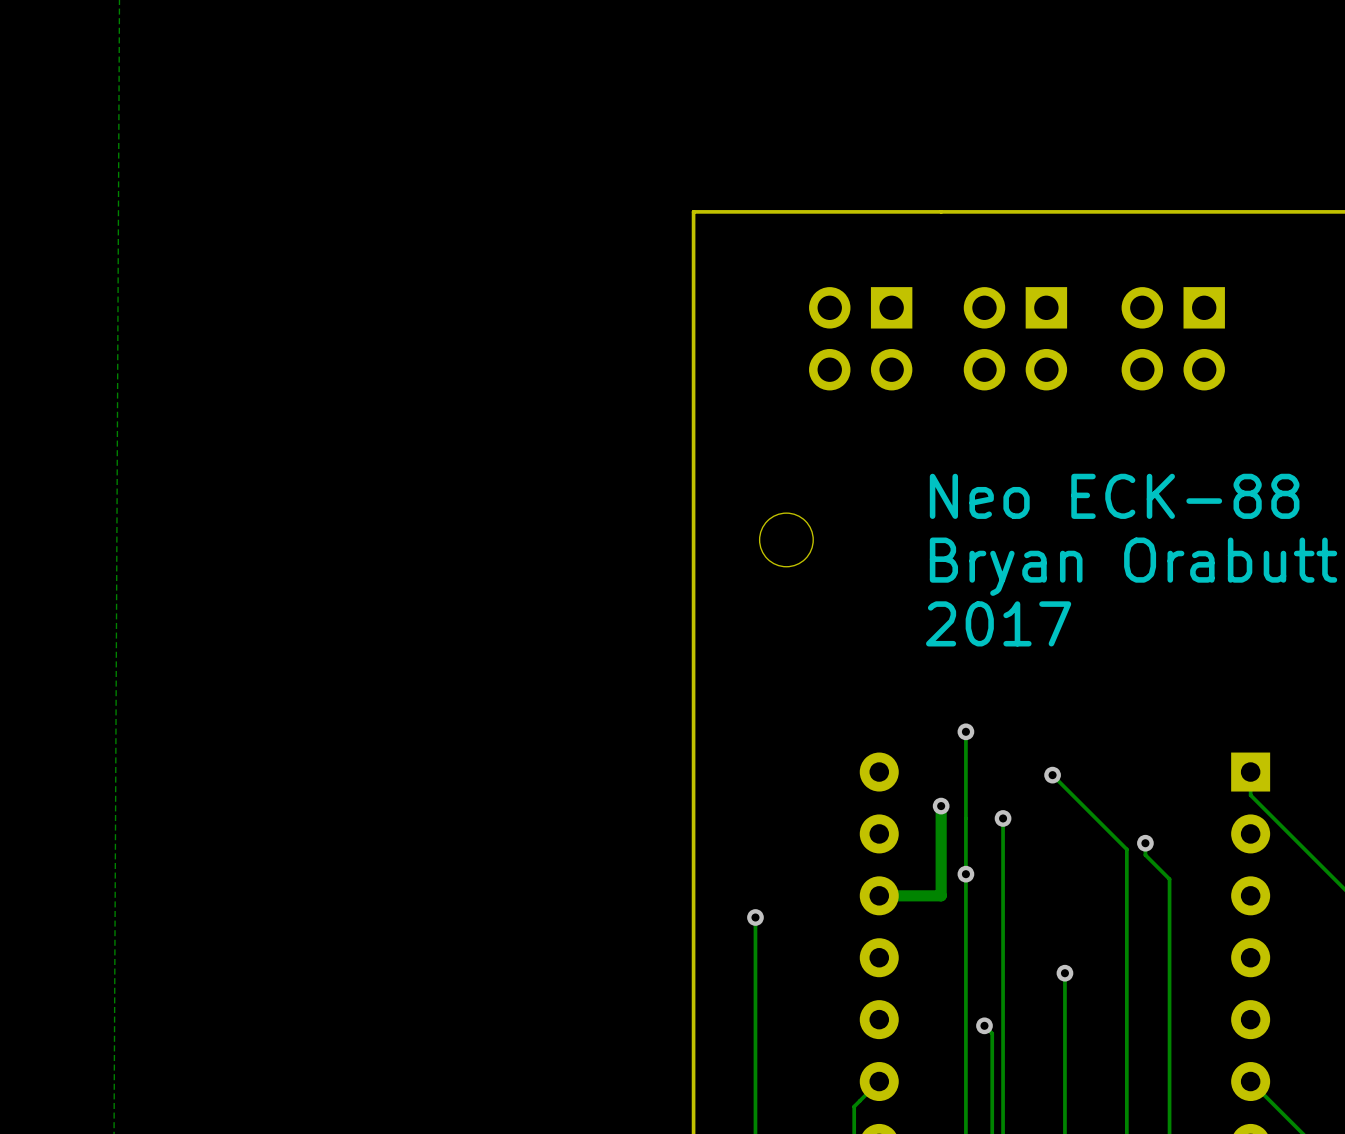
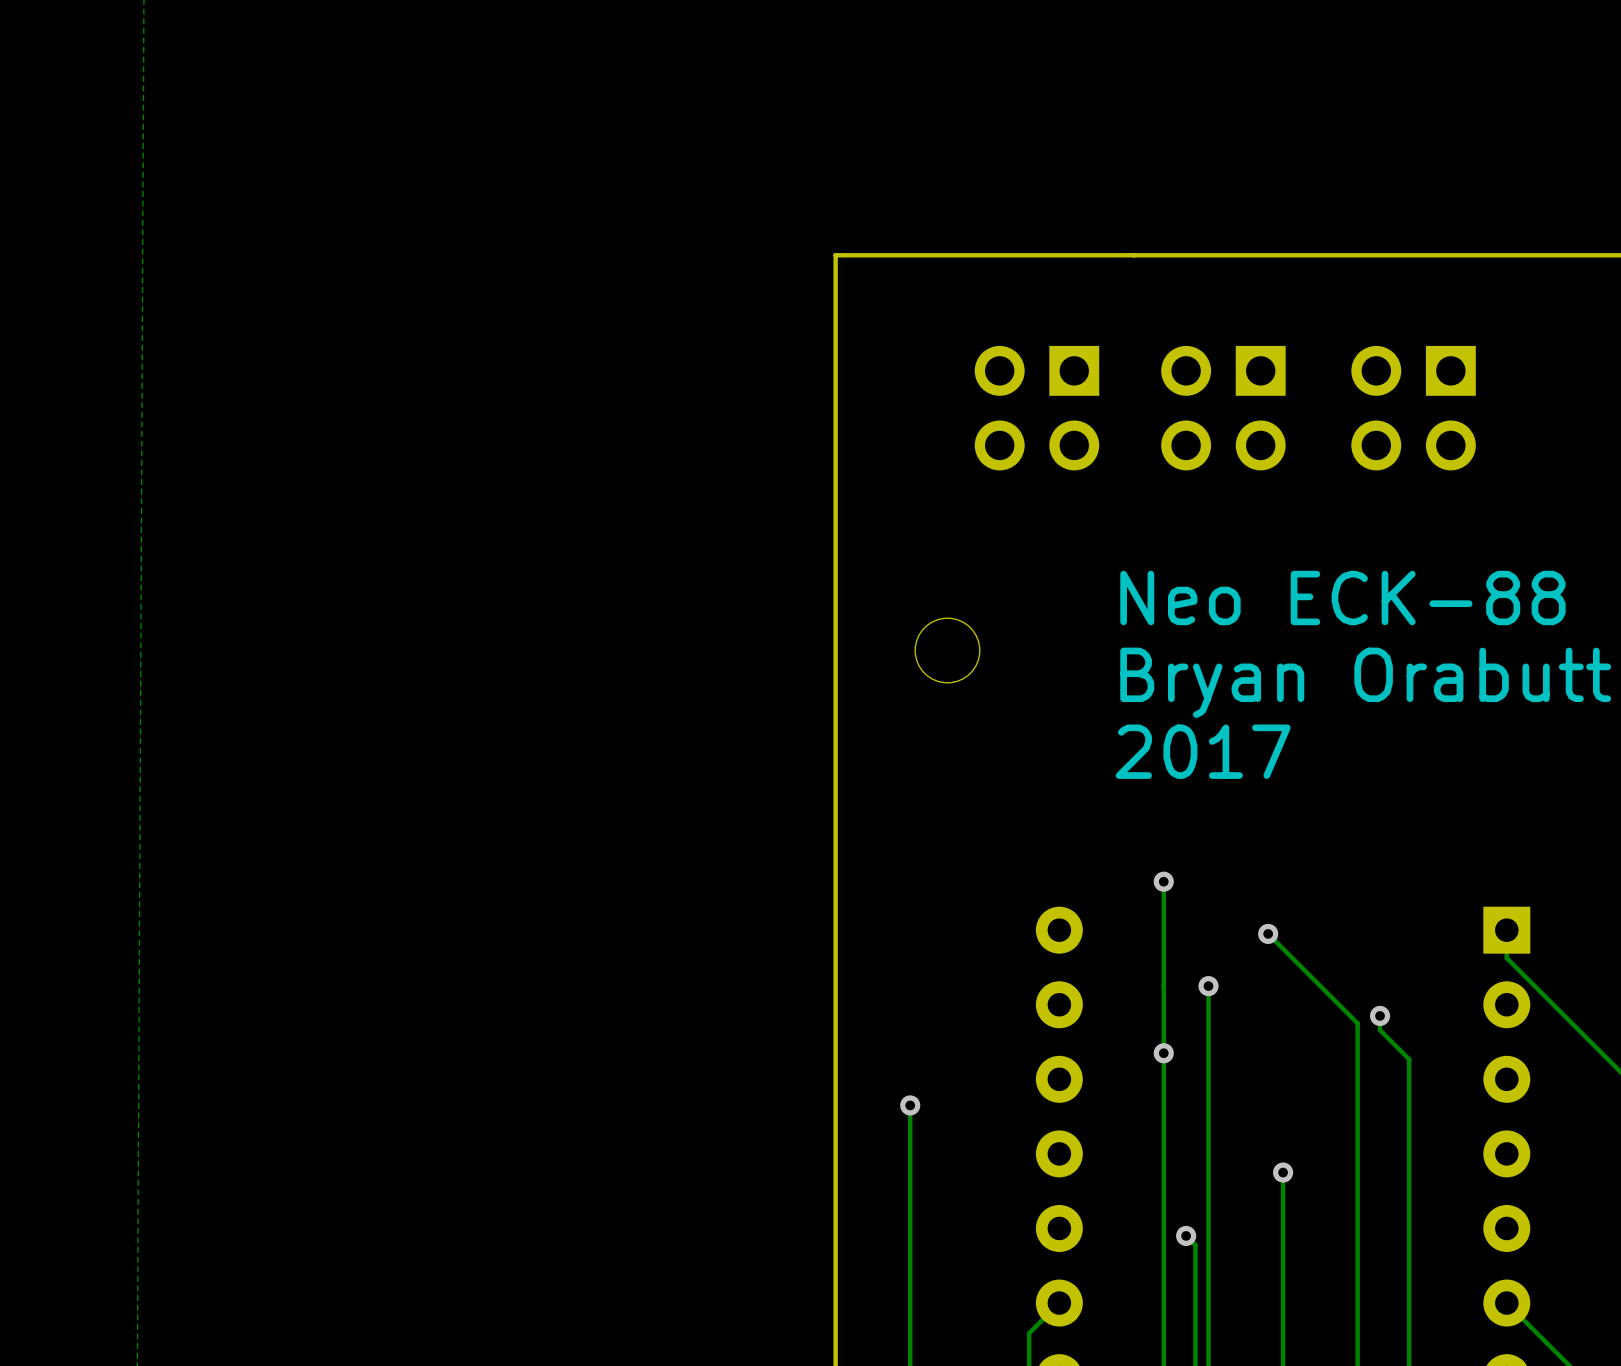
track: (941, 806) (941, 895) (879, 895) -> none
via: (941, 806) -> none

